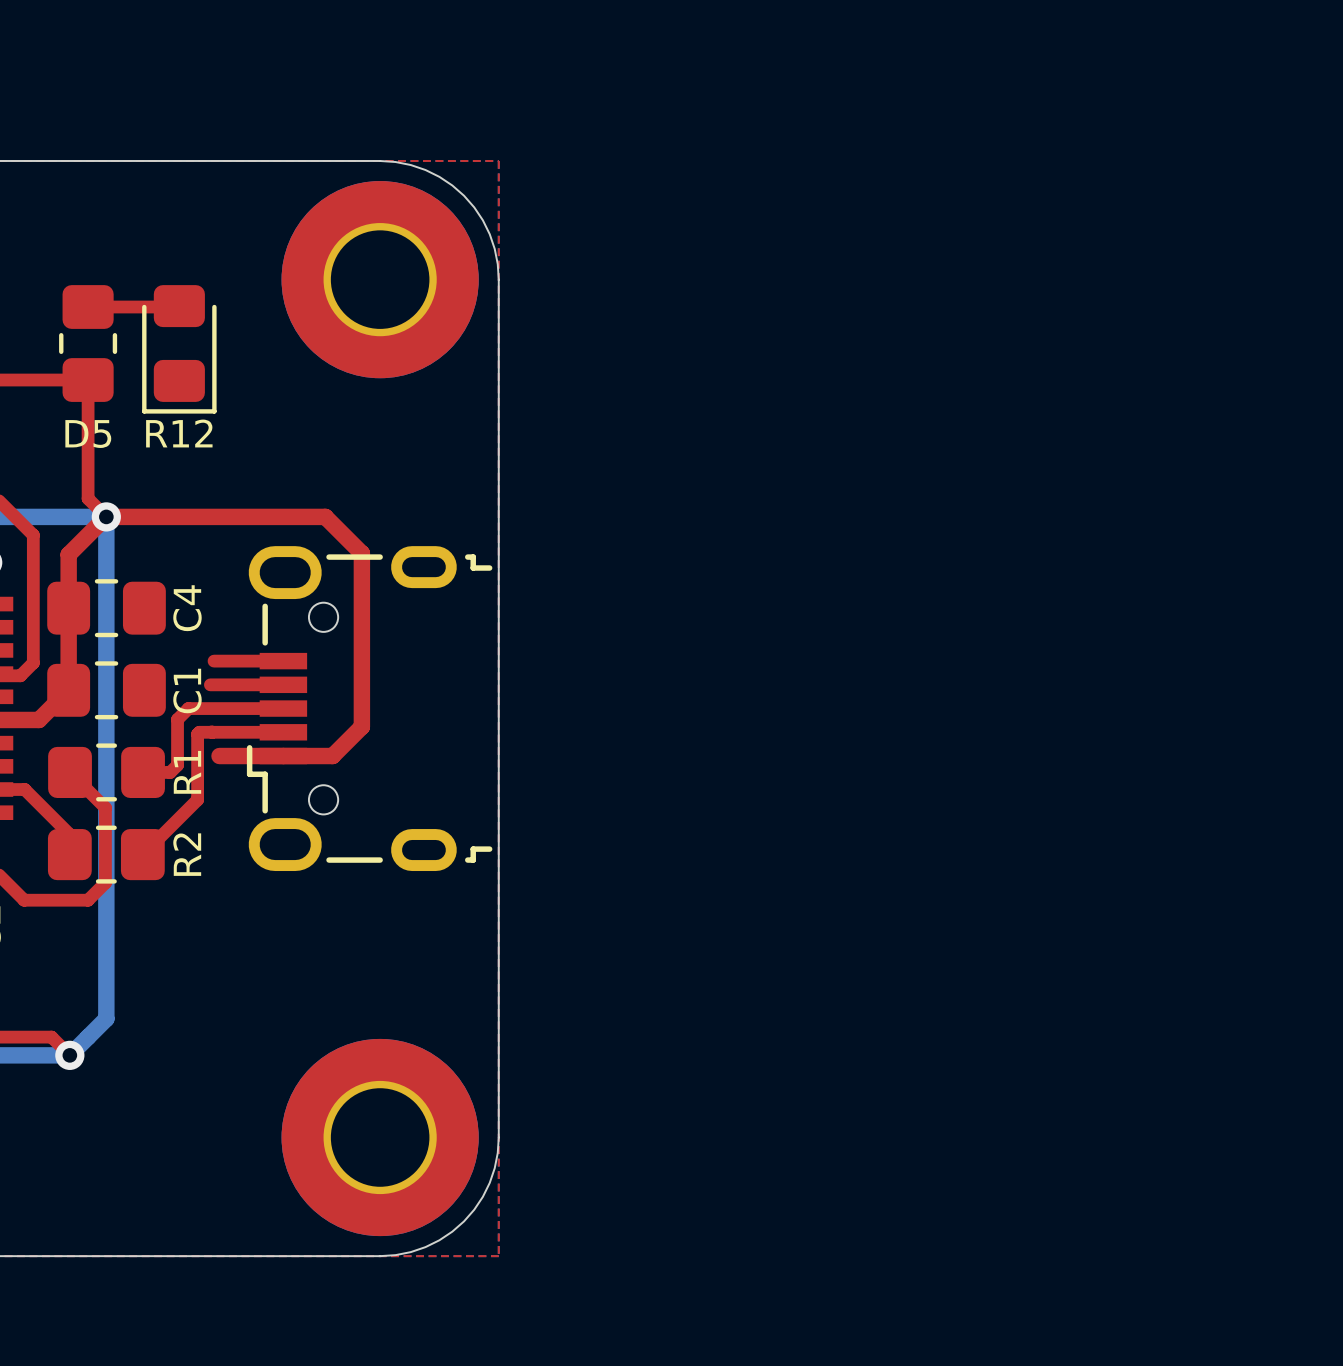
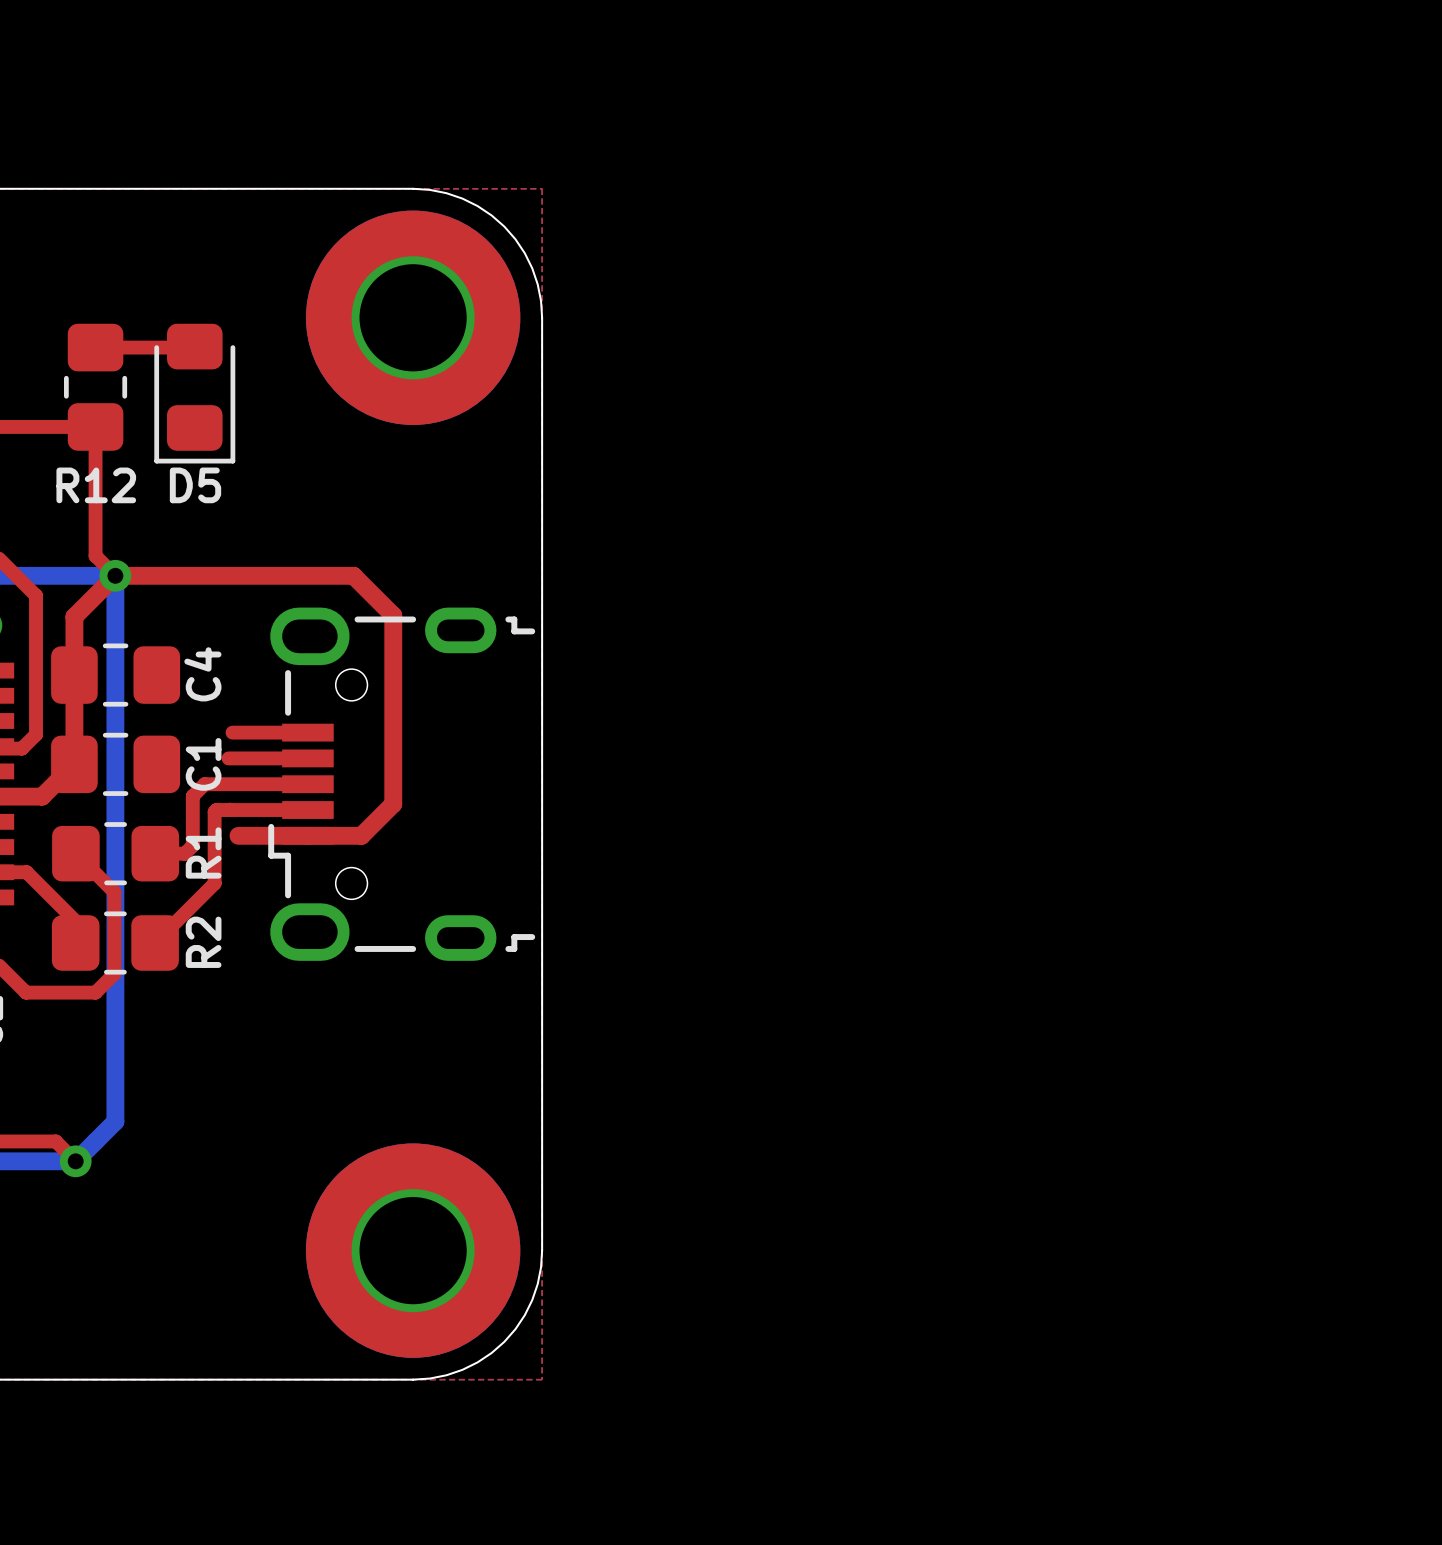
R12 name position: R12 (179, 433) -> R12 (96, 485)
D5 name position: D5 (88, 434) -> D5 (195, 485)

